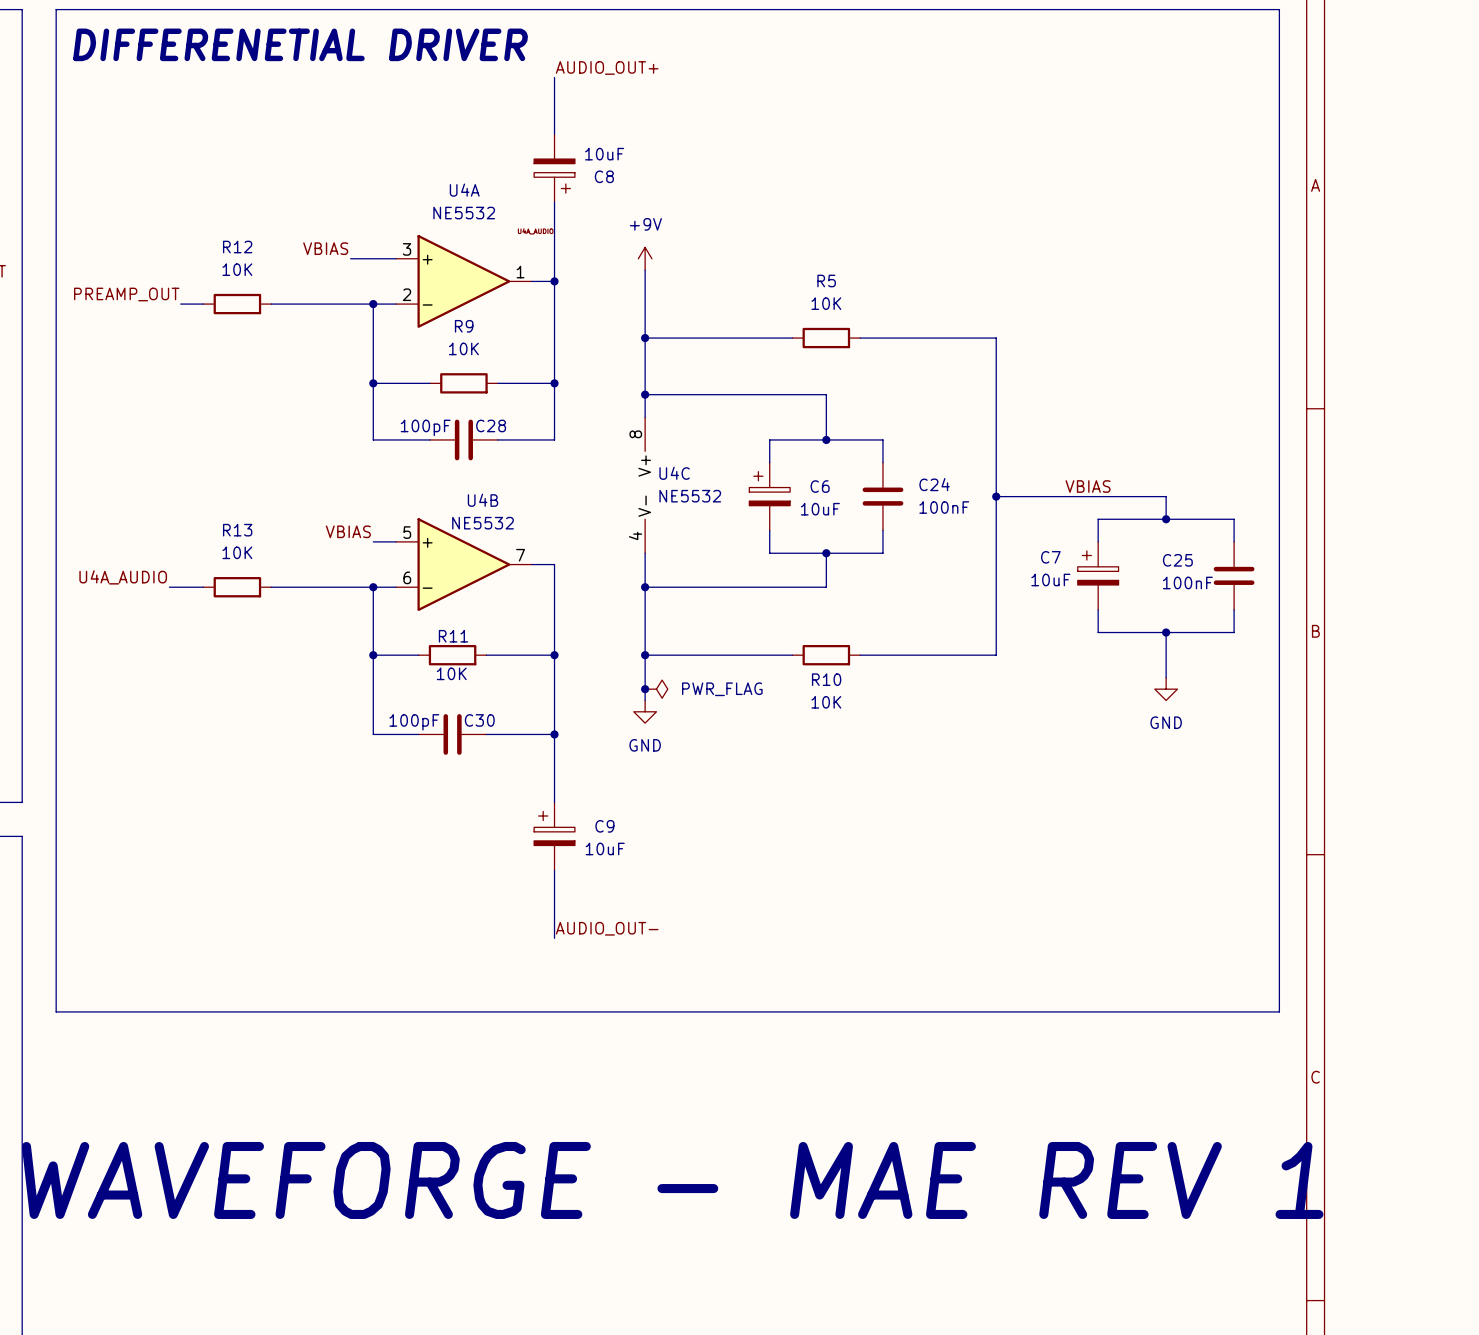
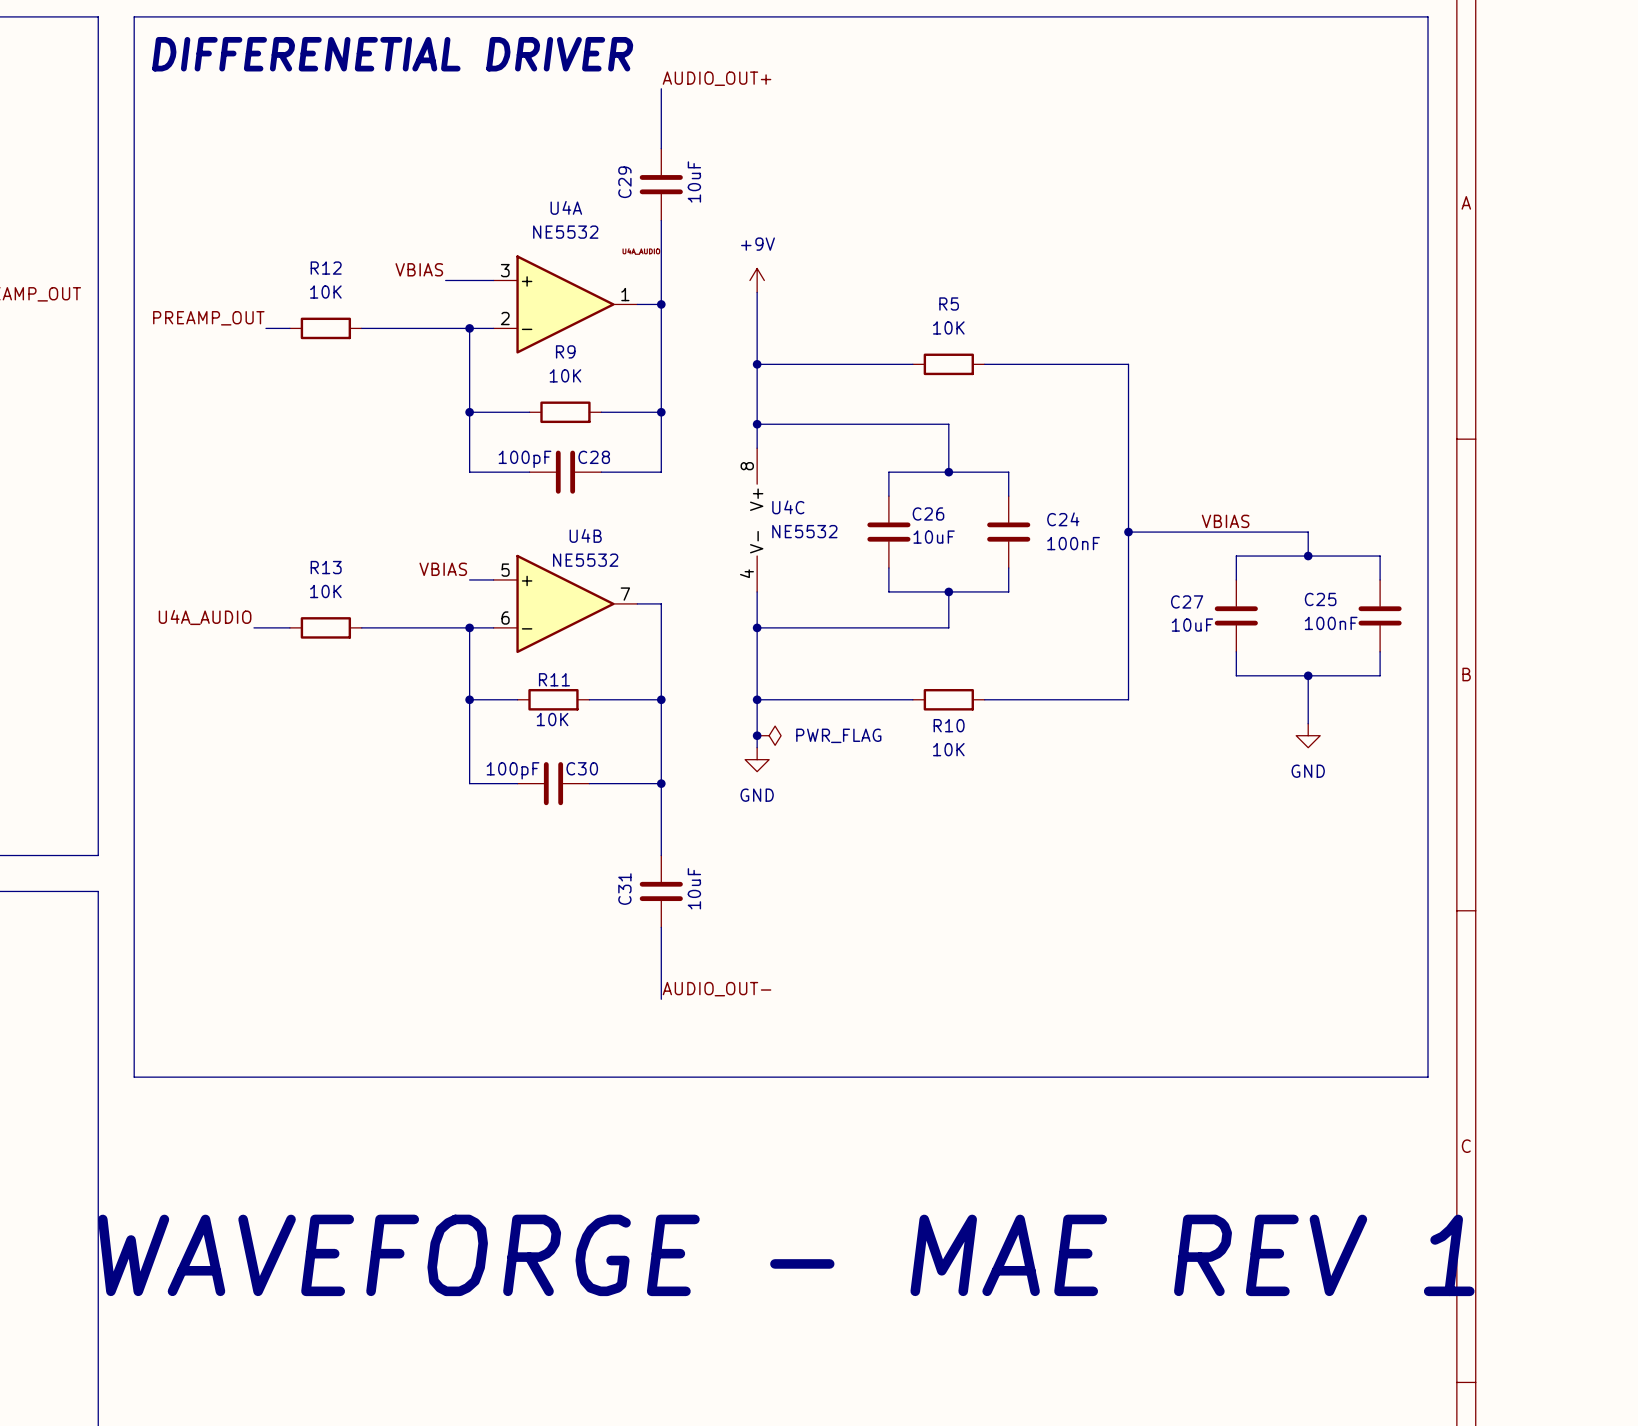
C8: 10uF (554, 168) -> none
C29: none -> 10uF (661, 184)
C6: 10uF (769, 496) -> none
C26: none -> 10uF (888, 532)
C7: 10uF (1098, 575) -> none
C27: none -> 10uF (1236, 615)
C9: 10uF (554, 836) -> none
C31: none -> 10uF (661, 891)

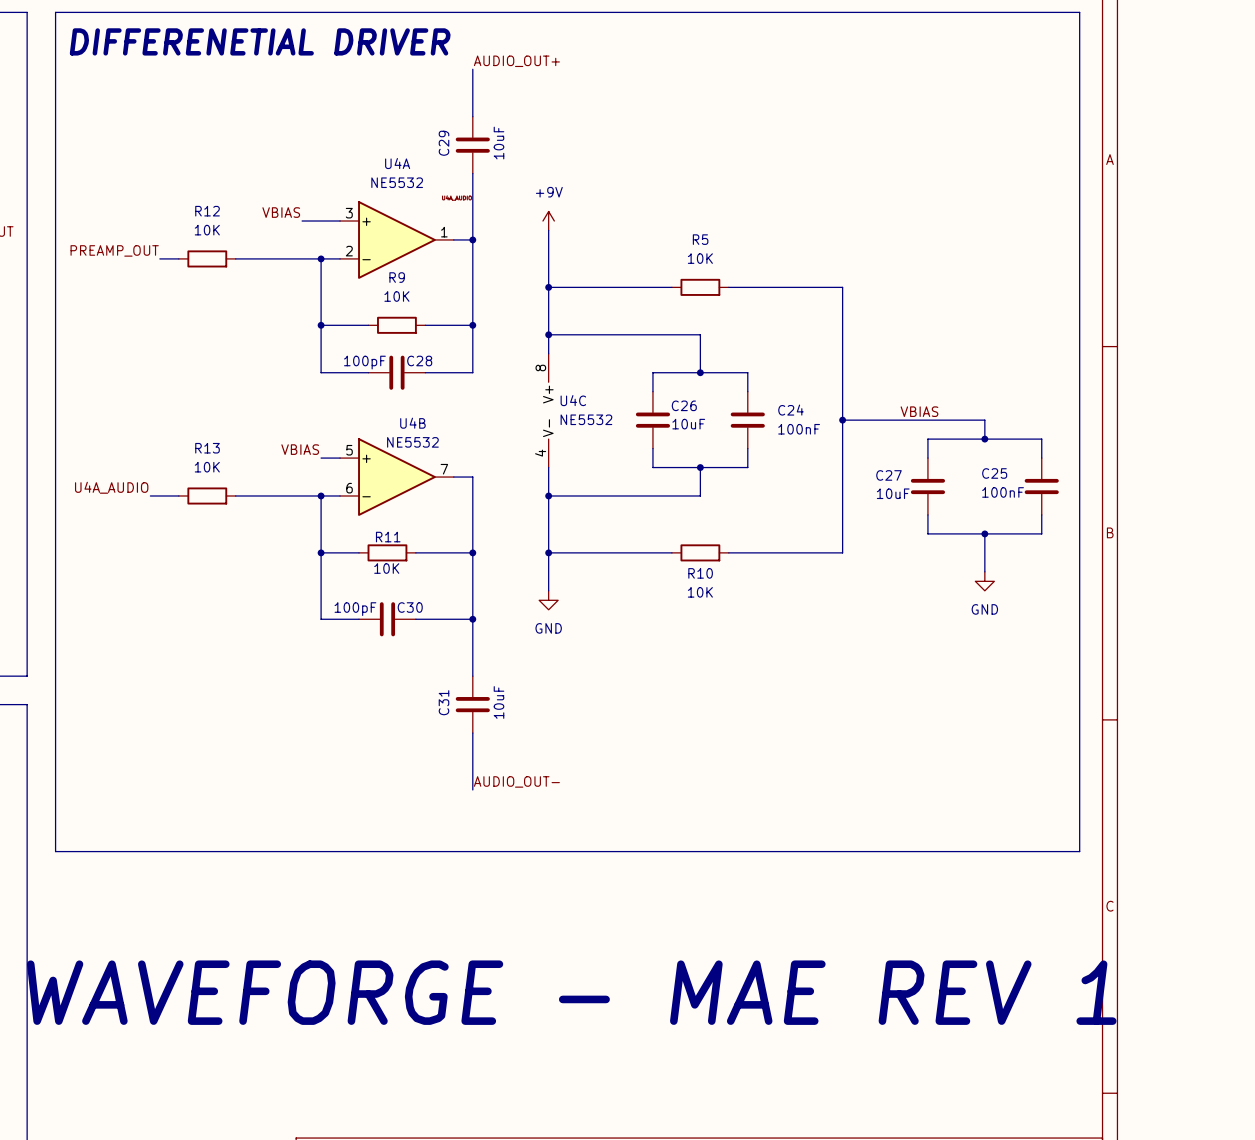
junction: (757, 735) -> none
power symbol: PWR_FLAG (769, 735) -> none

